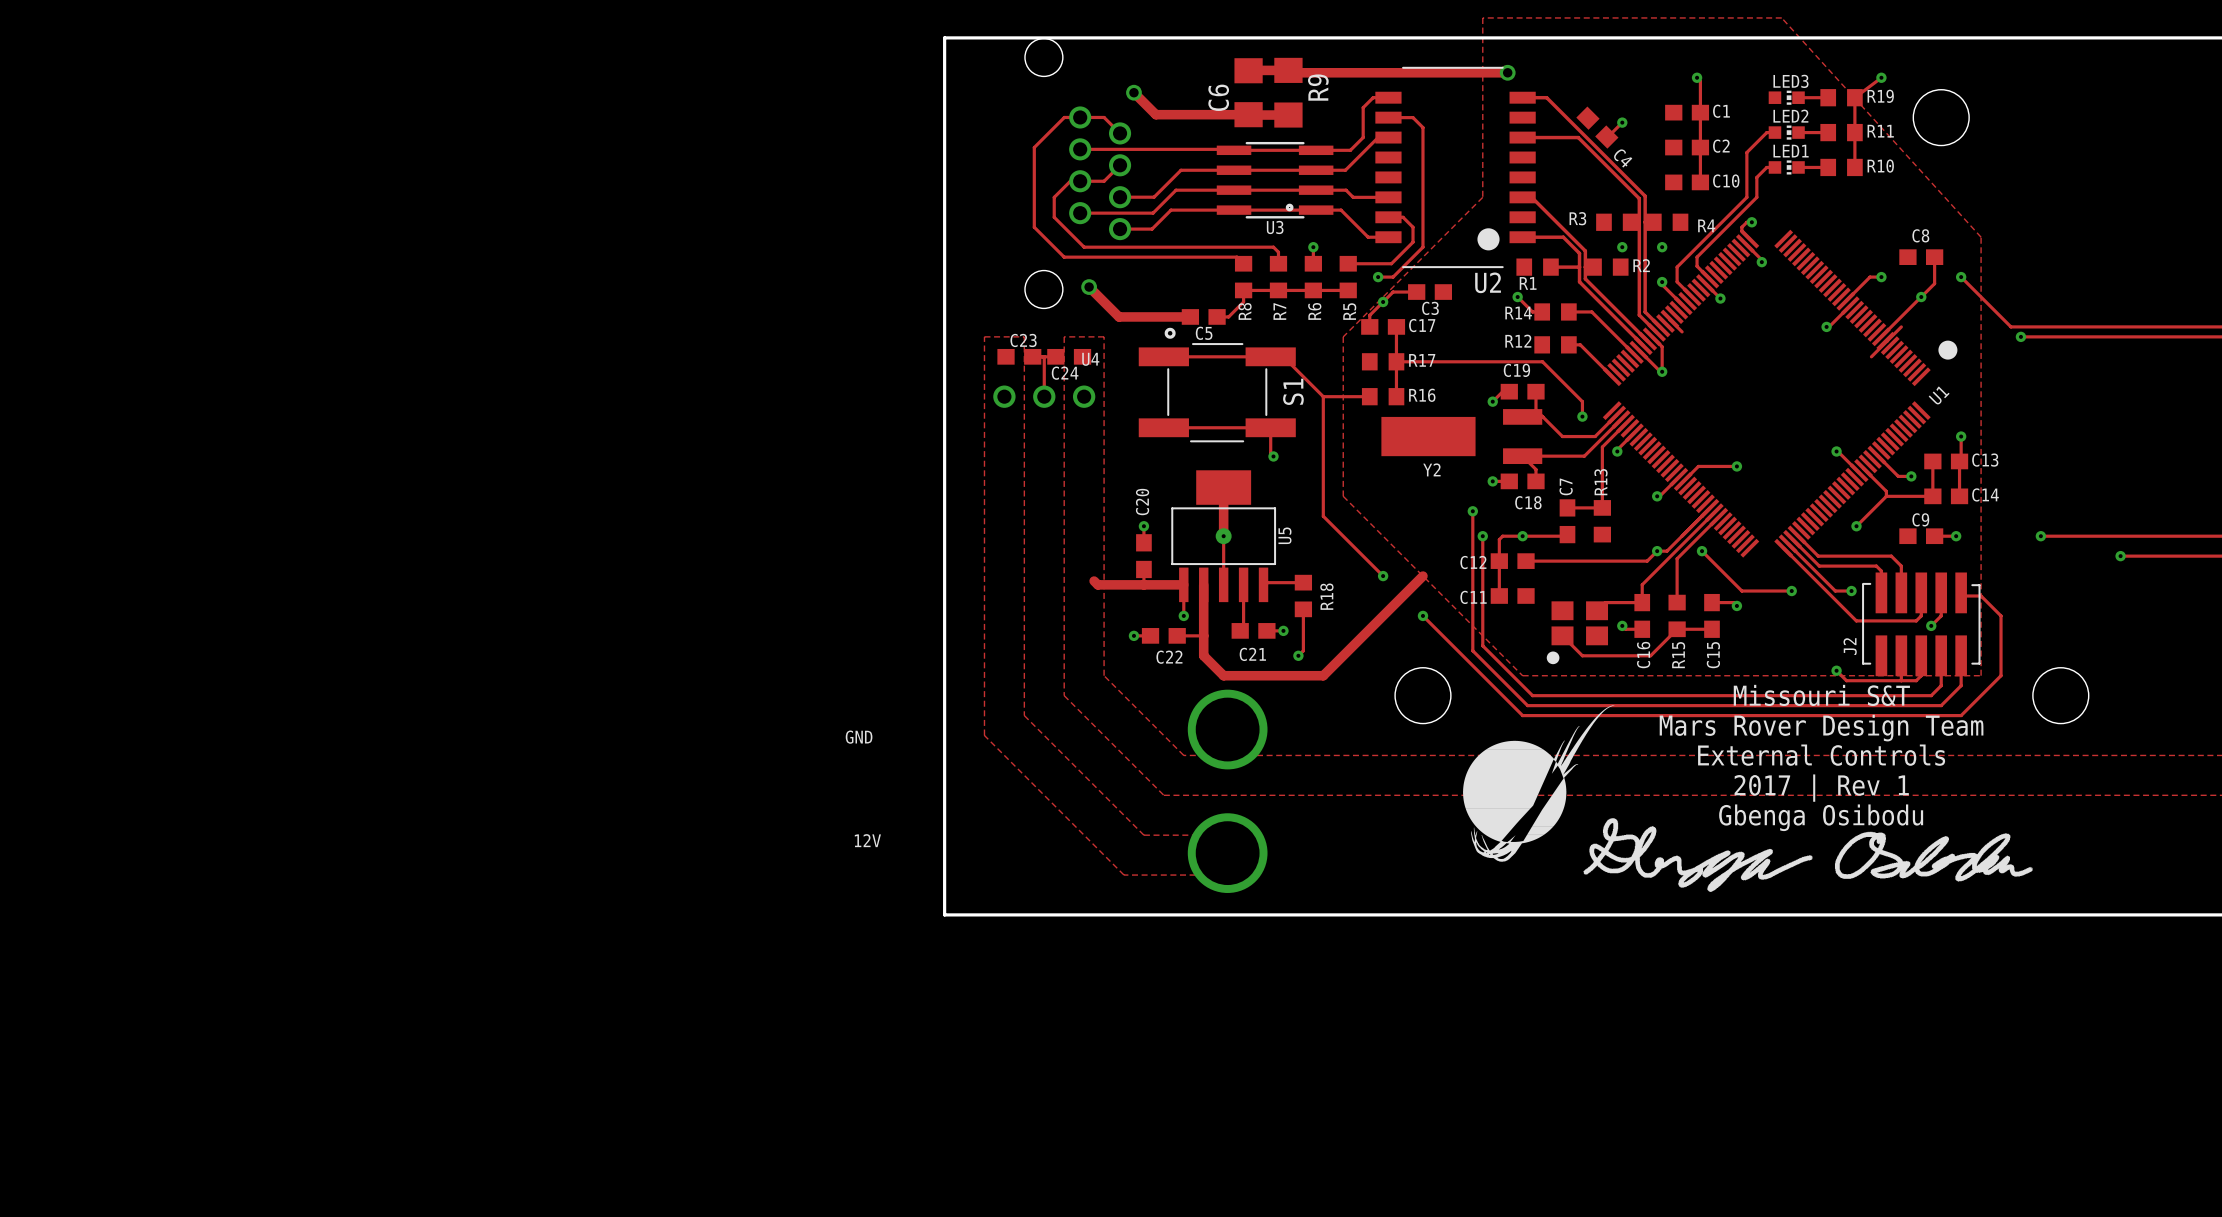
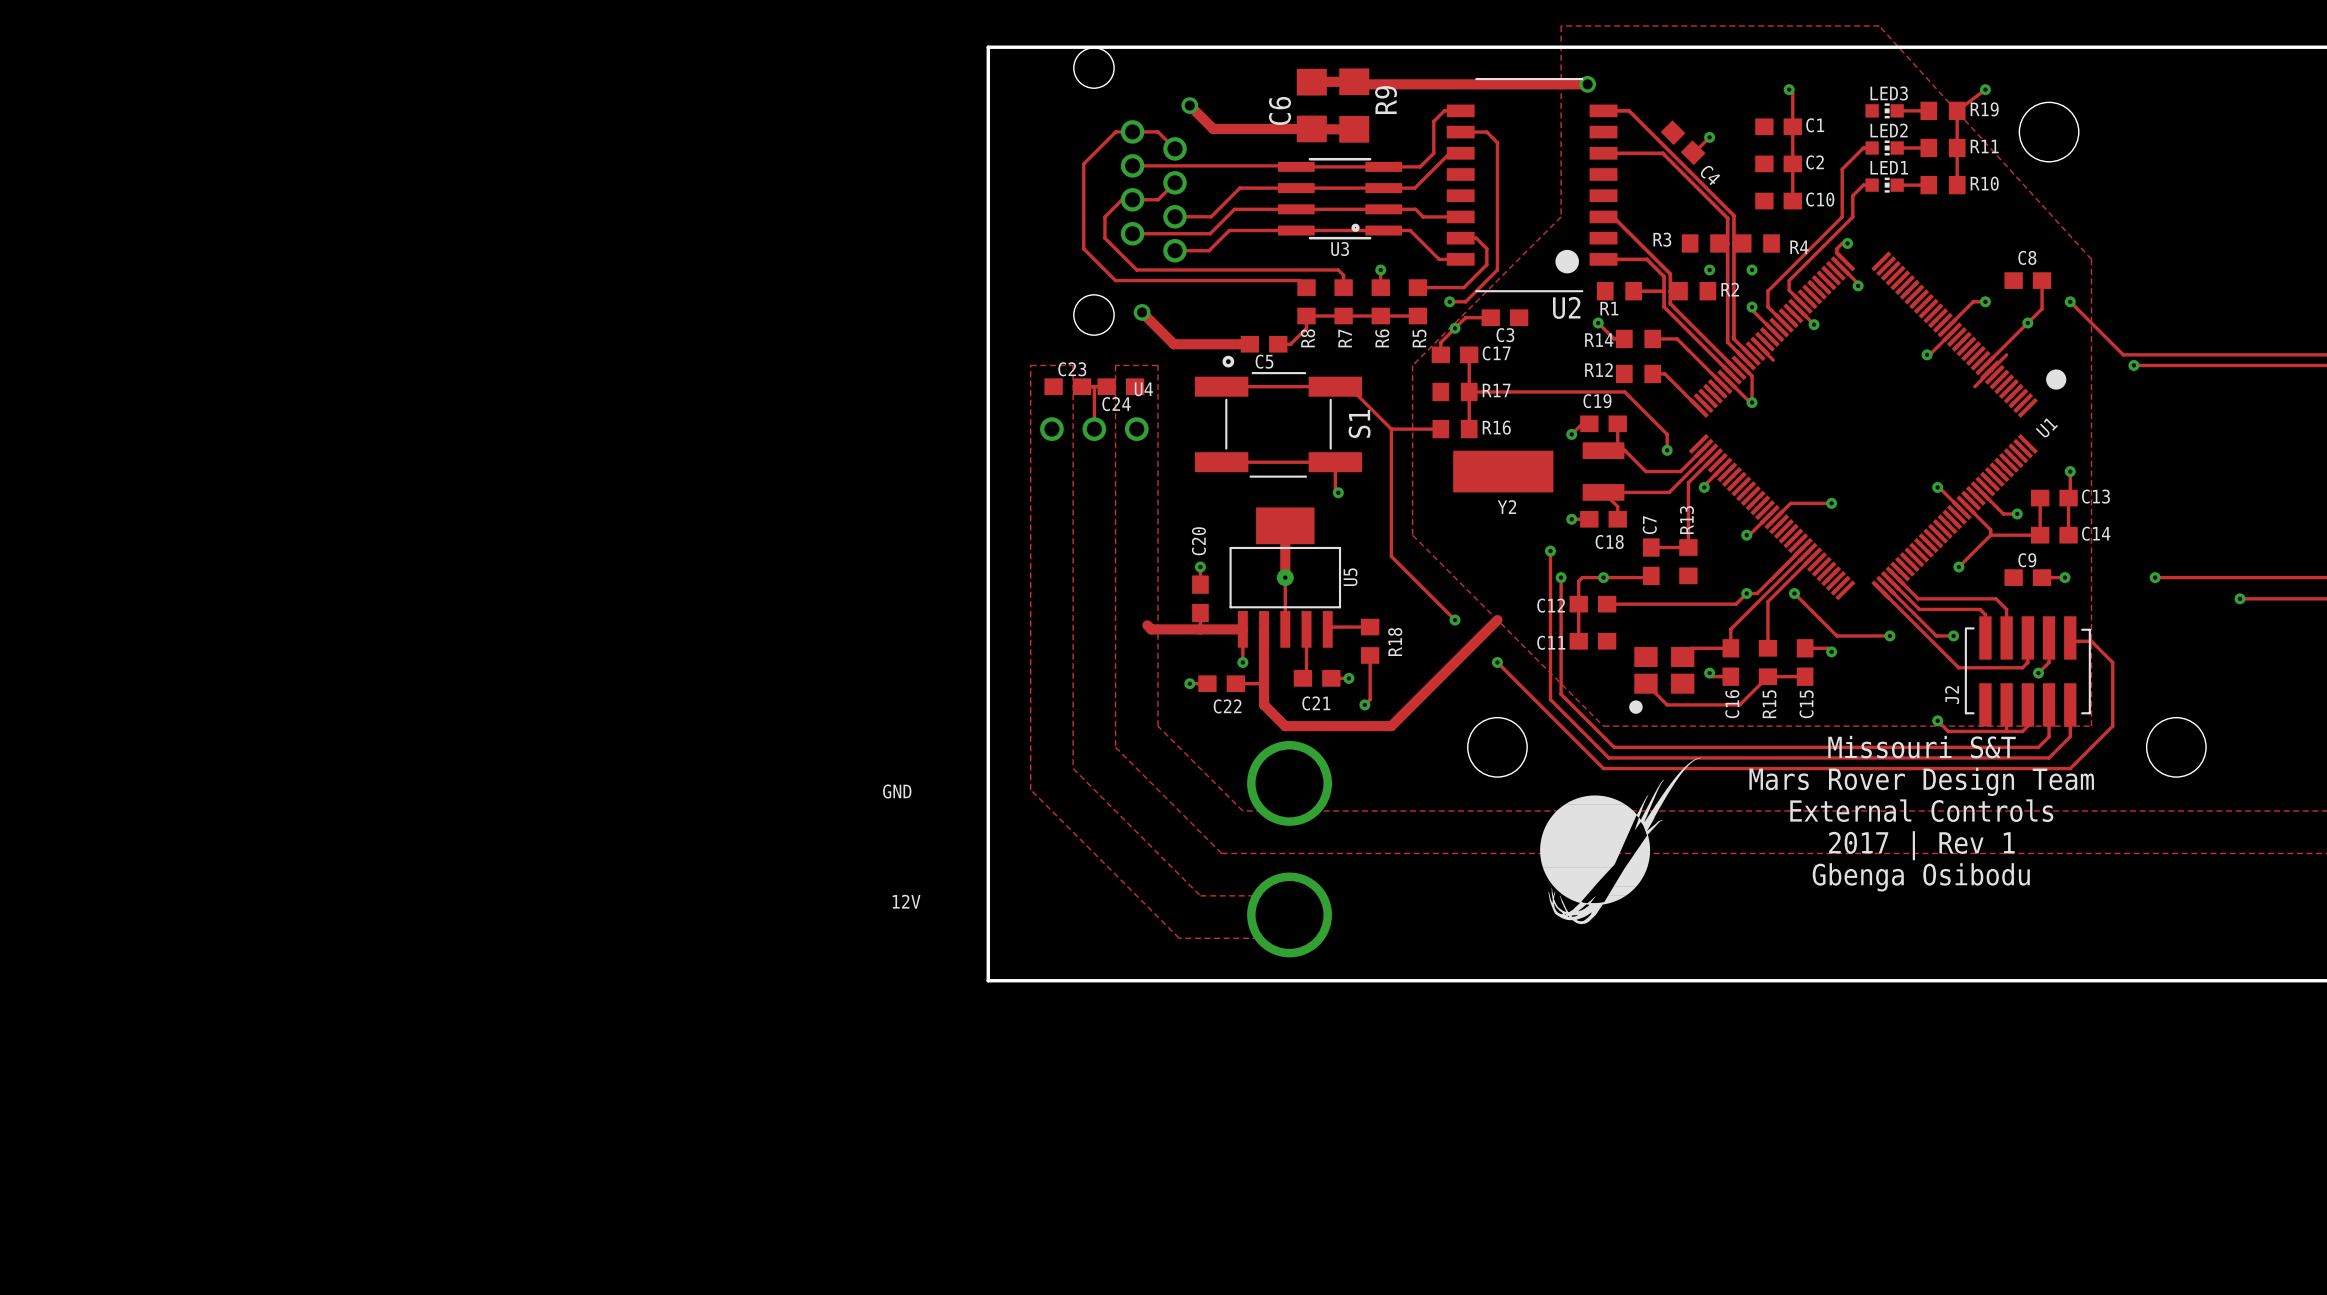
drawing: [1583, 818, 2033, 892] -> none

